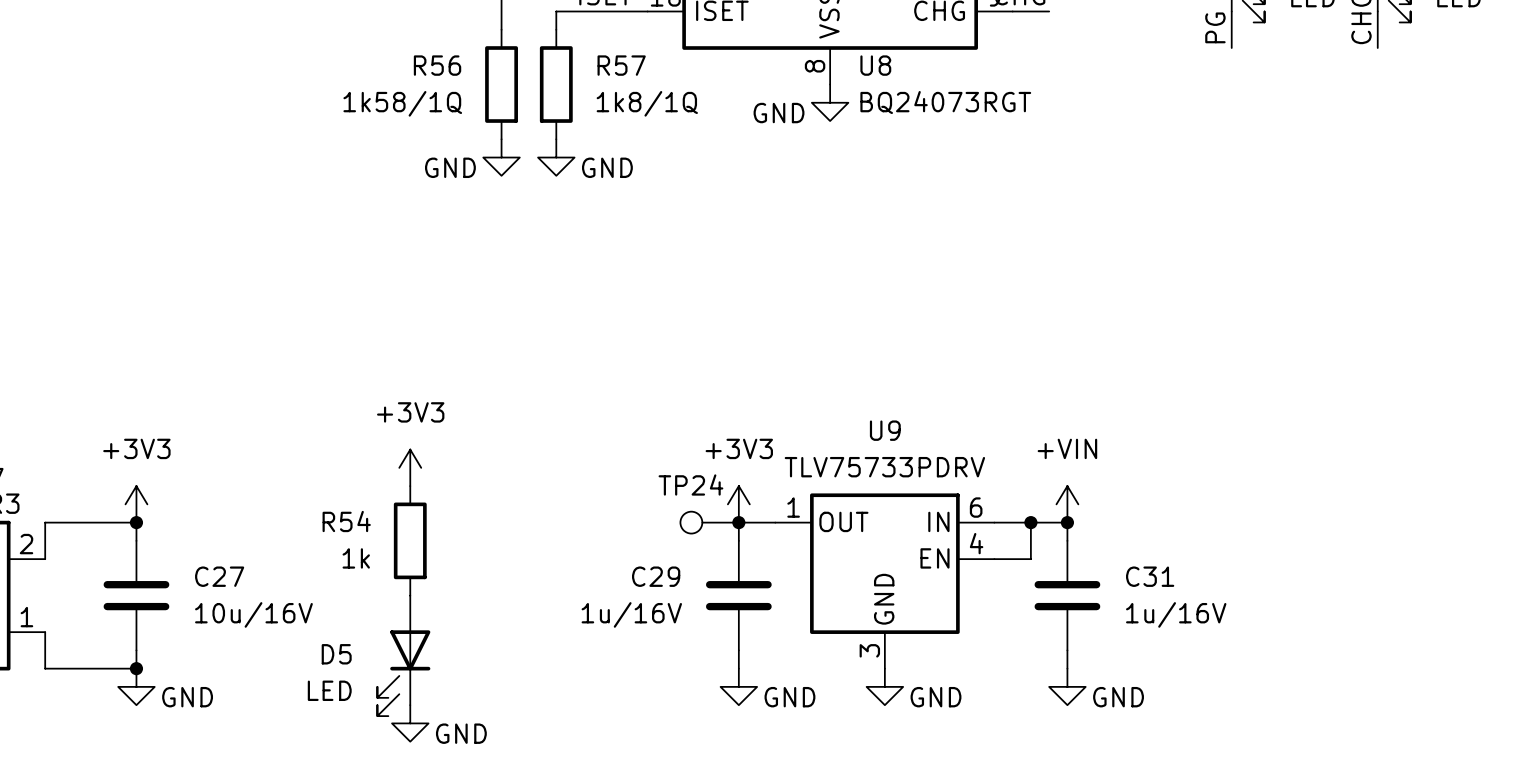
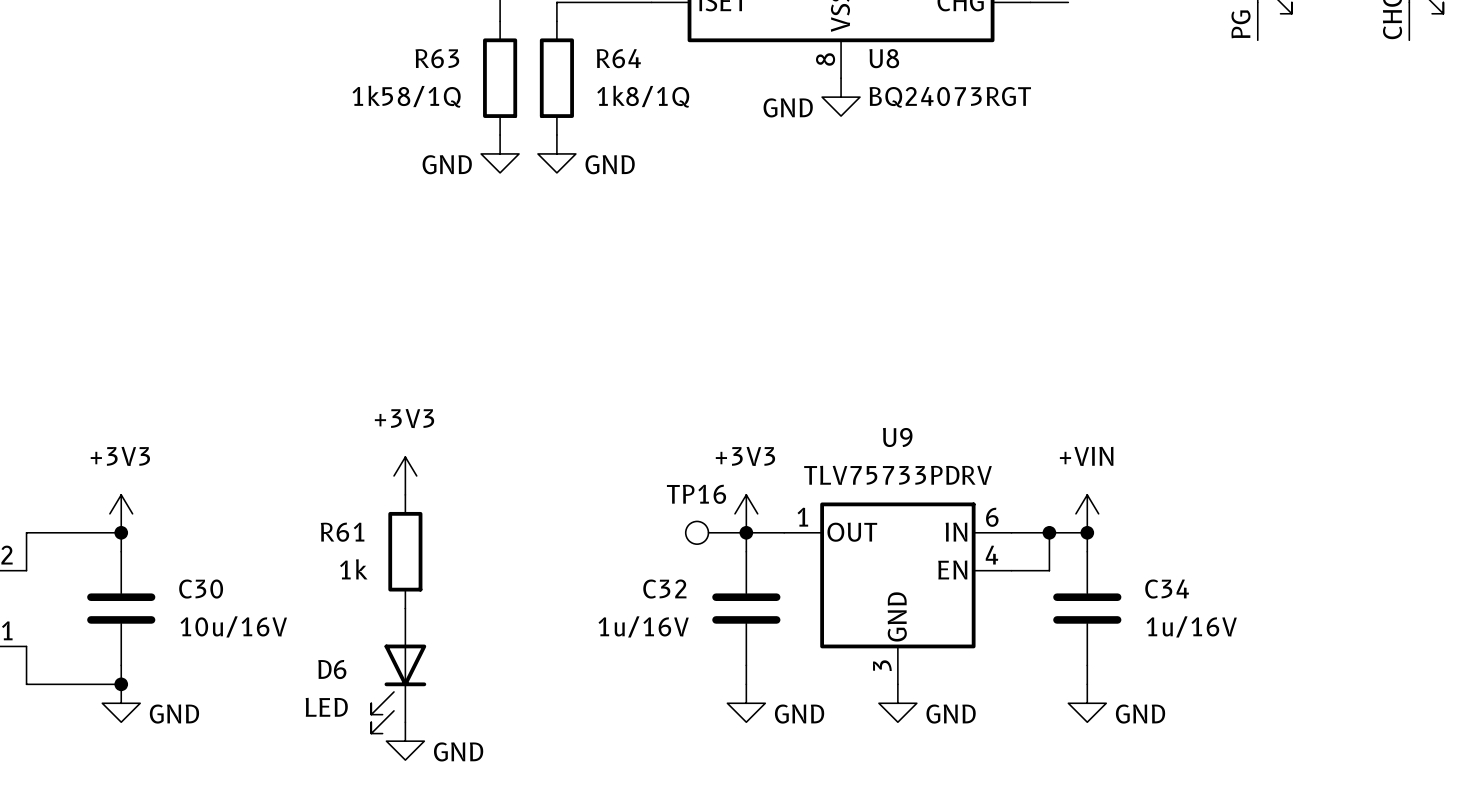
R56 name: R56 (437, 65) -> R63 (437, 58)
R57 name: R57 (621, 65) -> R64 (618, 58)
TP24 name: TP24 (690, 484) -> TP16 (696, 494)
R54 name: R54 (346, 521) -> R61 (342, 532)
C27 name: C27 (219, 576) -> C30 (201, 589)
C29 name: C29 (656, 576) -> C32 (664, 589)
C31 name: C31 (1150, 576) -> C34 (1167, 589)
D5 name: D5 (336, 654) -> D6 (332, 669)

